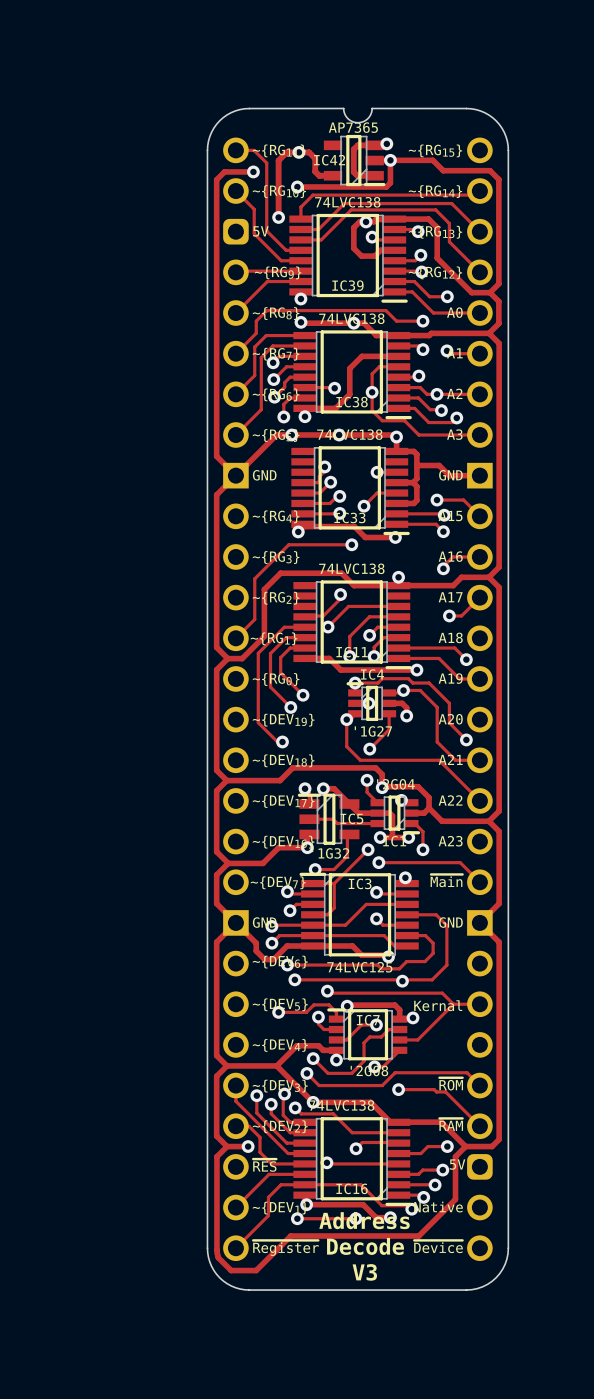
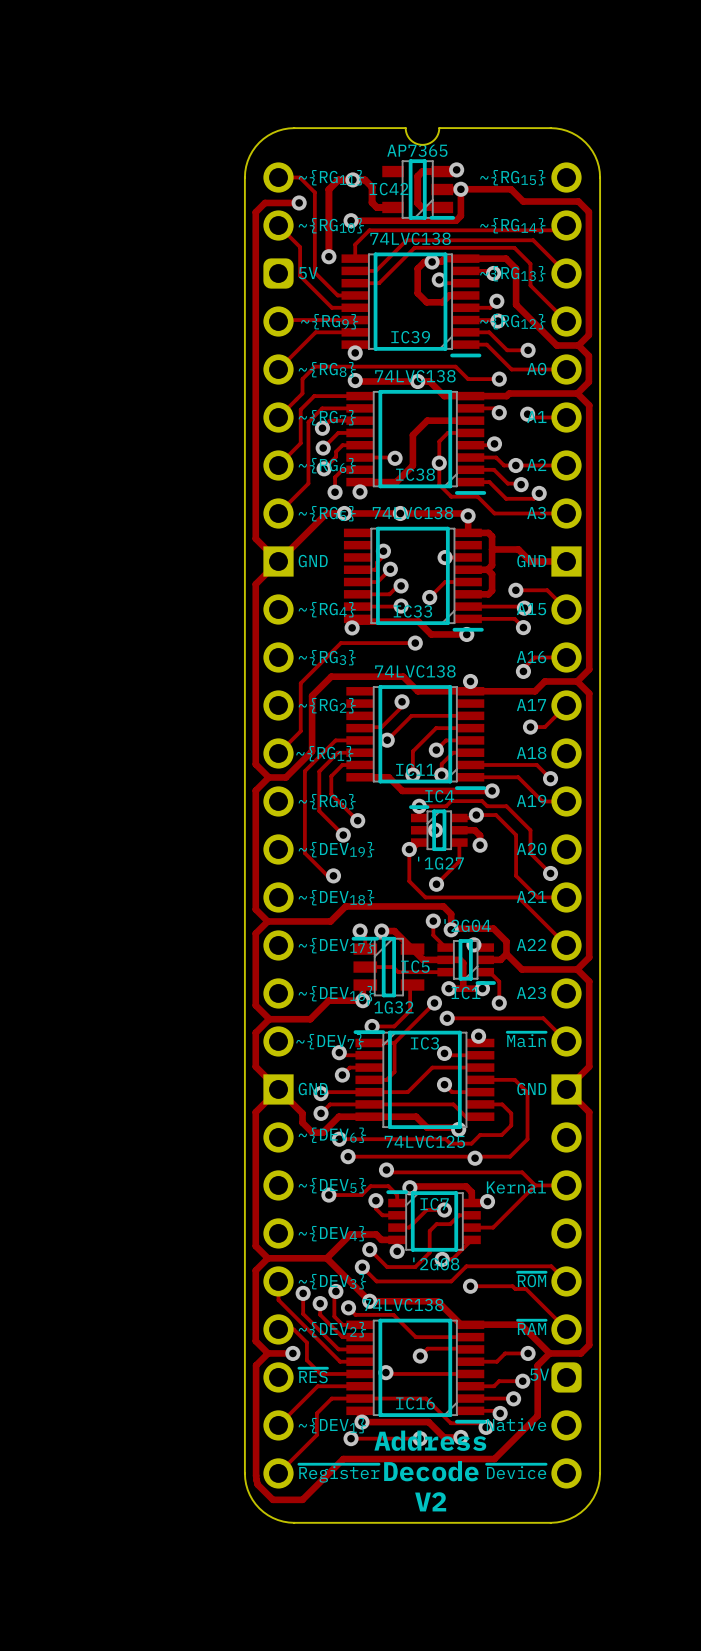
text: V3 (364, 1272) -> V2 (430, 1501)

